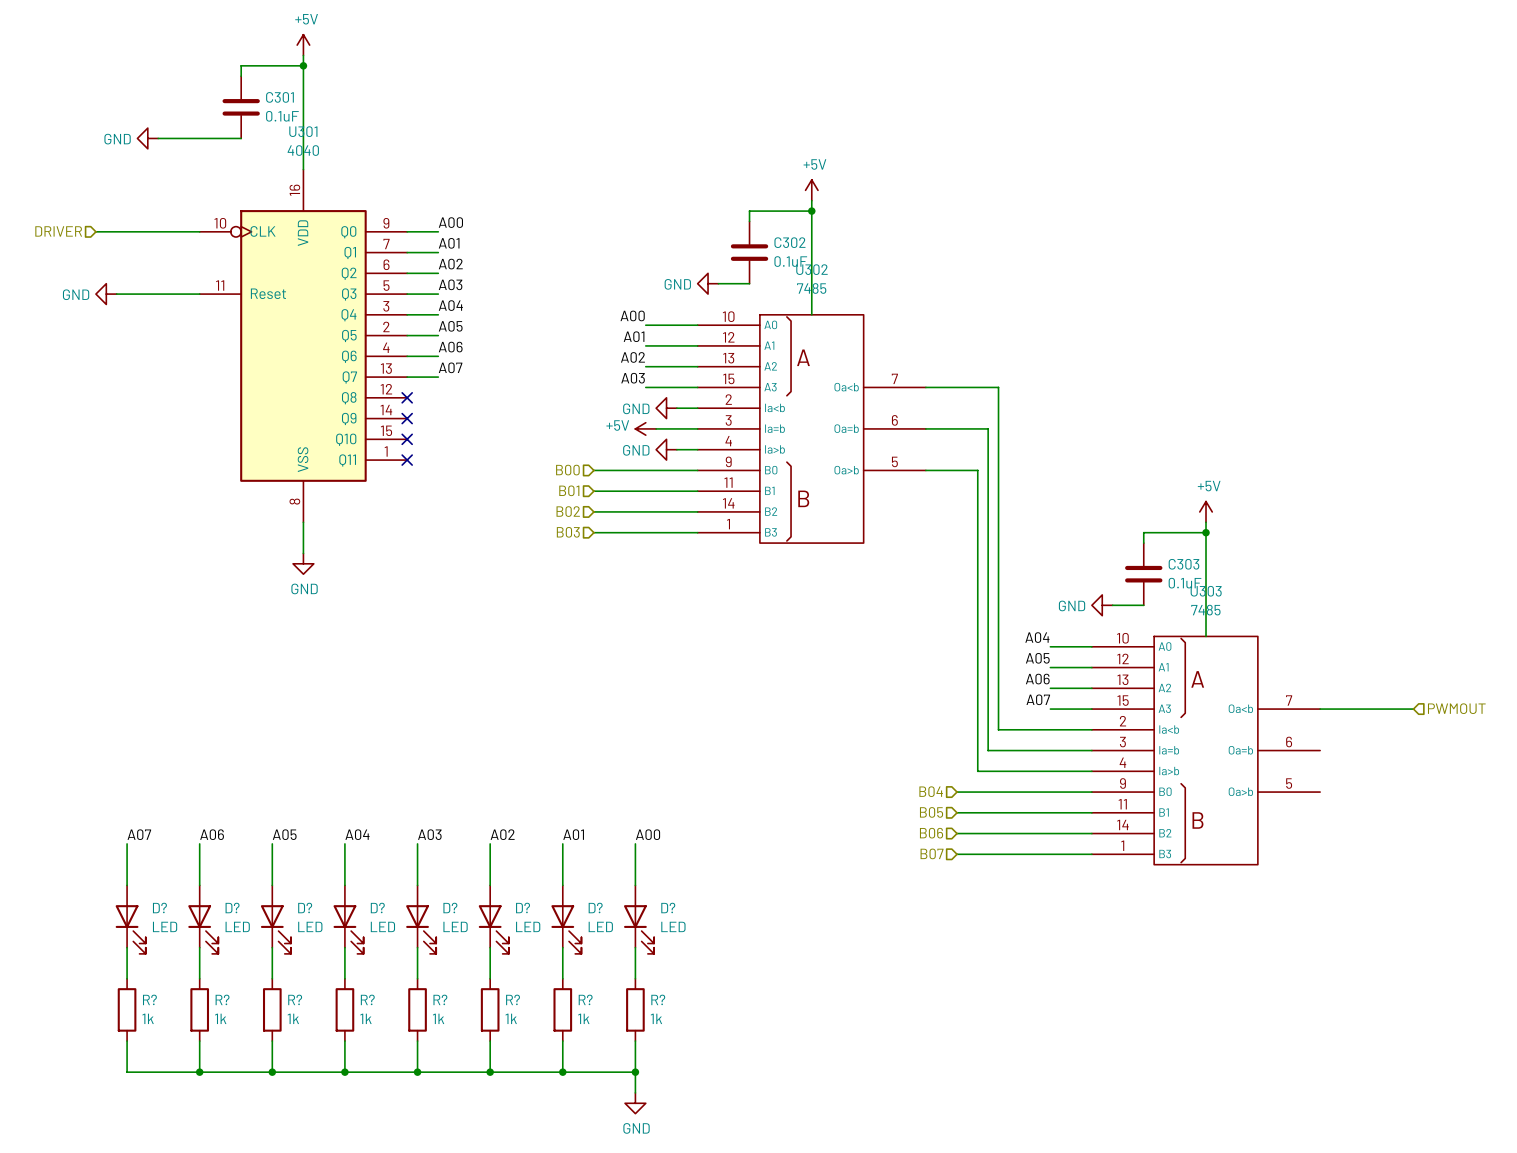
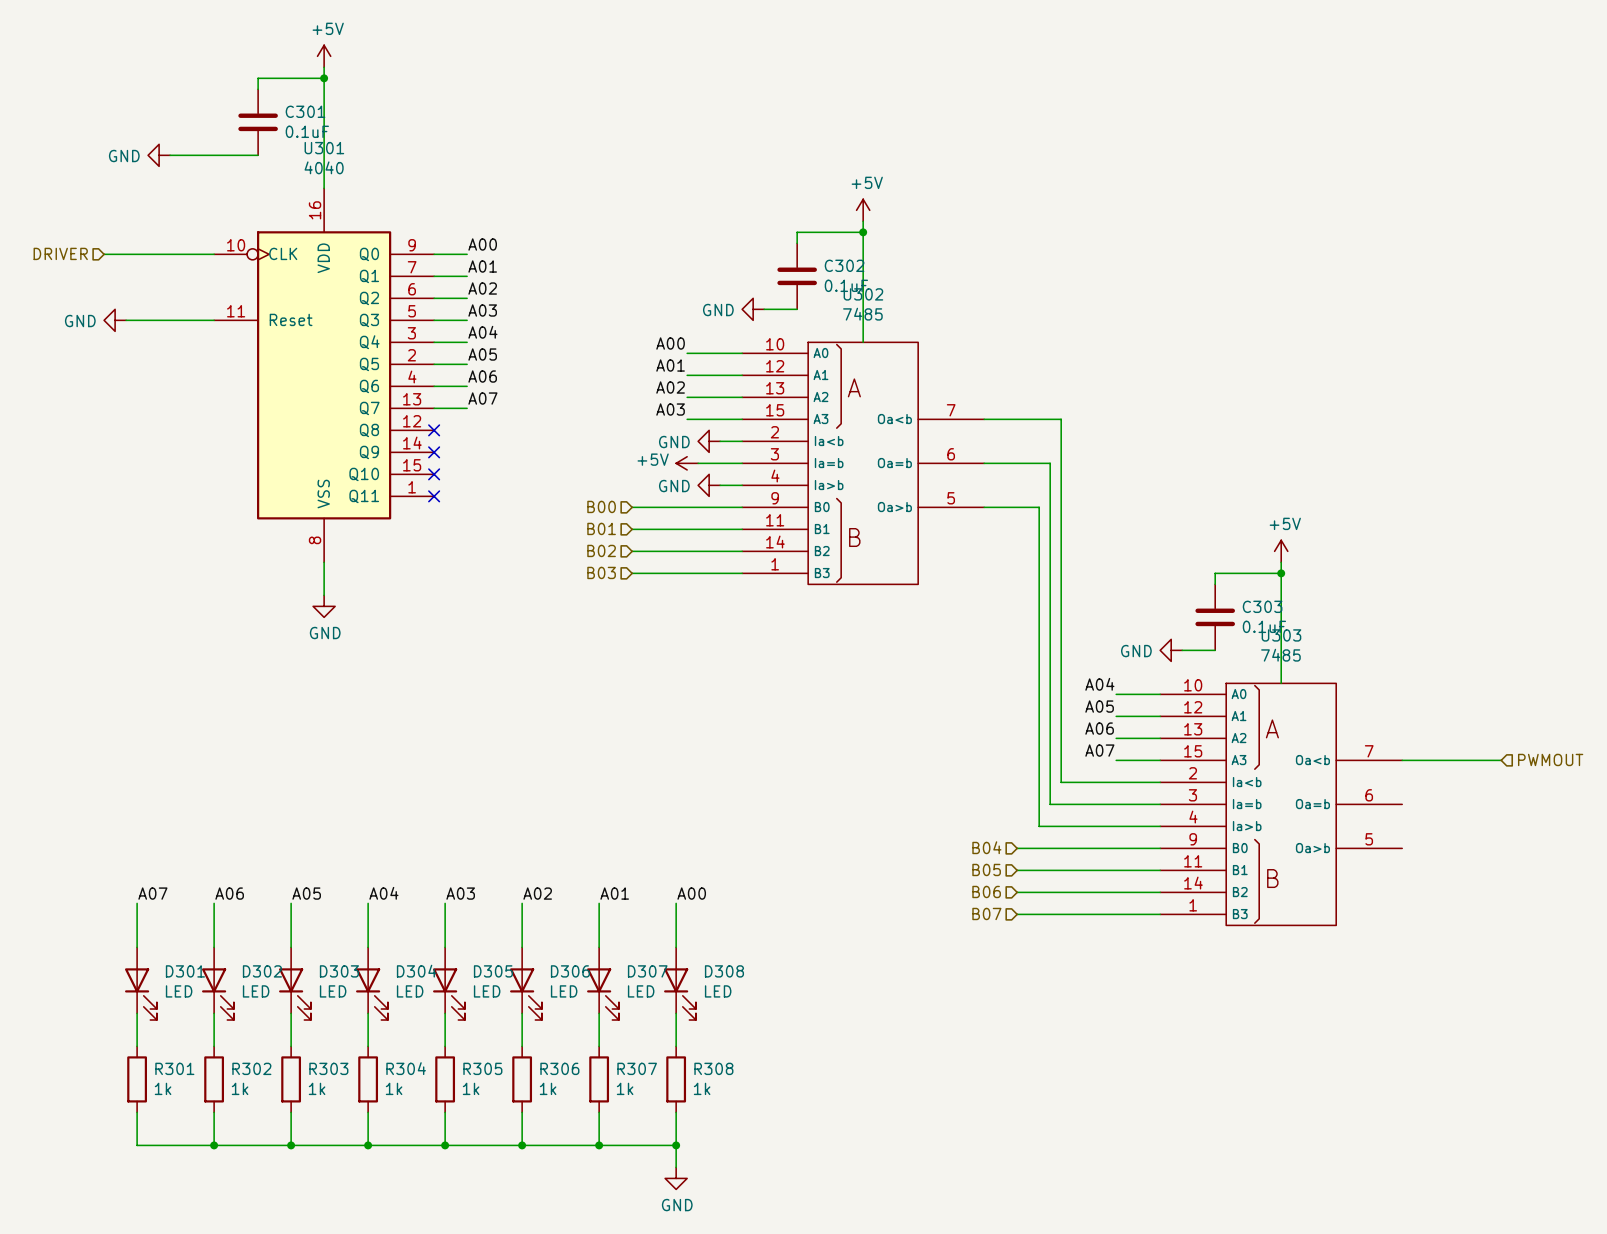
D? name: D? (159, 908) -> D301 (185, 971)
D? name: D? (232, 908) -> D302 (262, 971)
D? name: D? (305, 908) -> D303 (339, 971)
D? name: D? (377, 908) -> D304 (416, 971)
D? name: D? (450, 908) -> D305 (493, 971)
D? name: D? (523, 908) -> D306 (570, 971)
D? name: D? (595, 908) -> D307 (647, 971)
D? name: D? (668, 908) -> D308 (724, 971)
R? name: R? (149, 999) -> R301 (174, 1068)
R? name: R? (222, 999) -> R302 (251, 1068)
R? name: R? (295, 999) -> R303 (328, 1068)
R? name: R? (367, 999) -> R304 (406, 1068)
R? name: R? (440, 999) -> R305 (482, 1068)
R? name: R? (513, 999) -> R306 (559, 1068)
R? name: R? (585, 999) -> R307 (637, 1068)
R? name: R? (658, 999) -> R308 (713, 1068)

